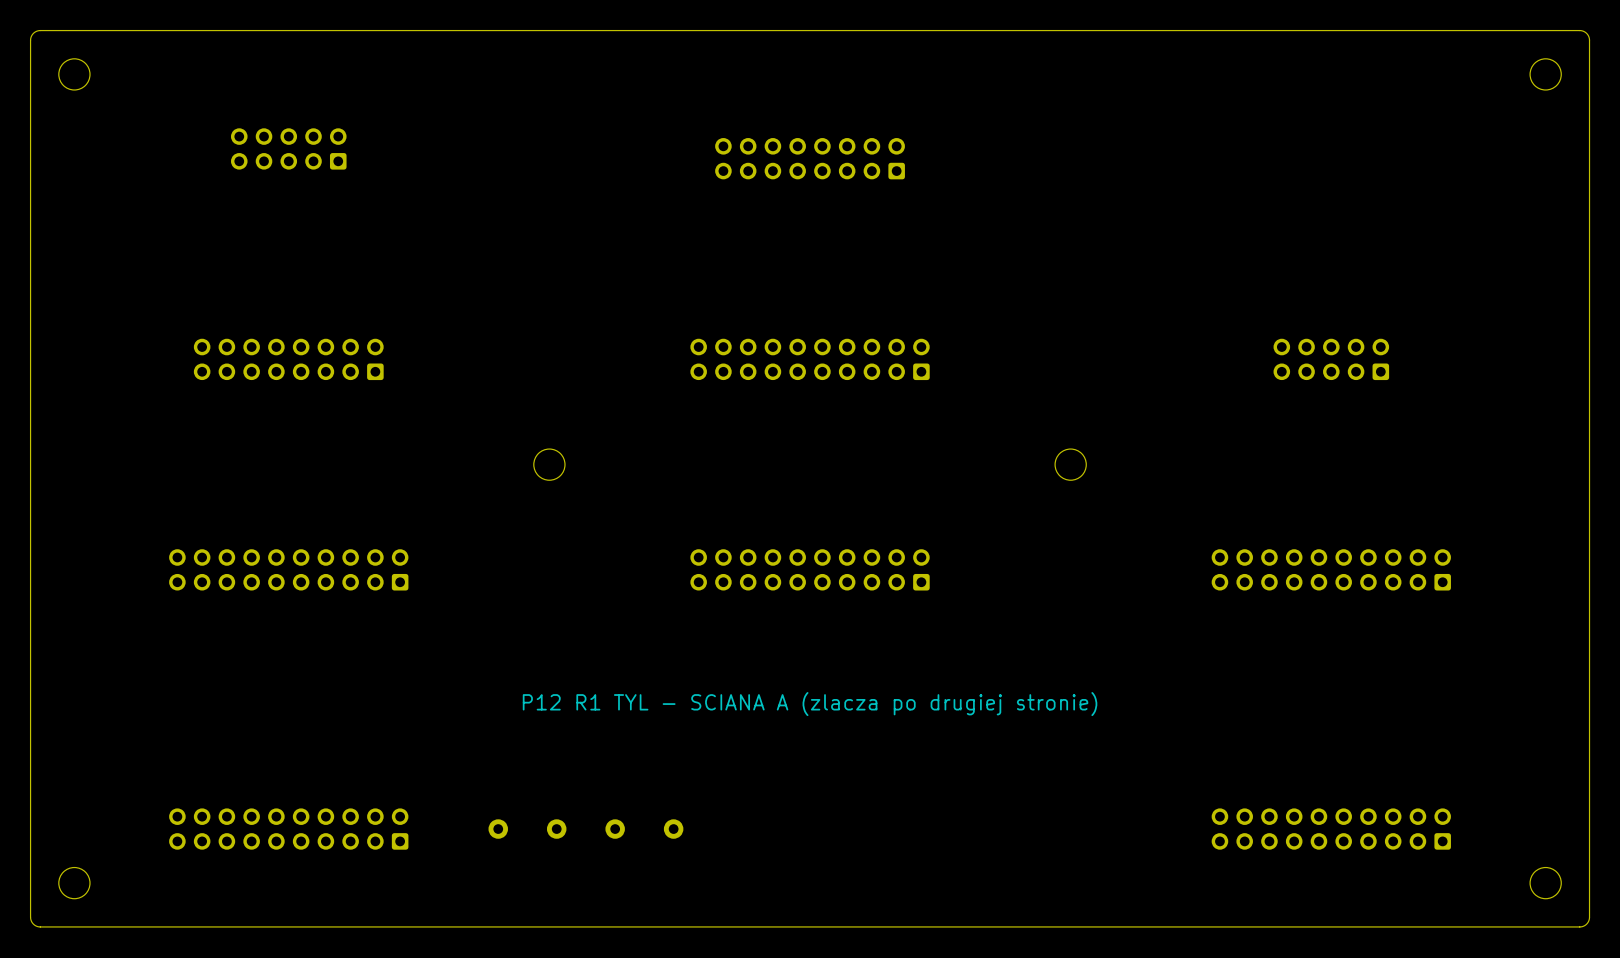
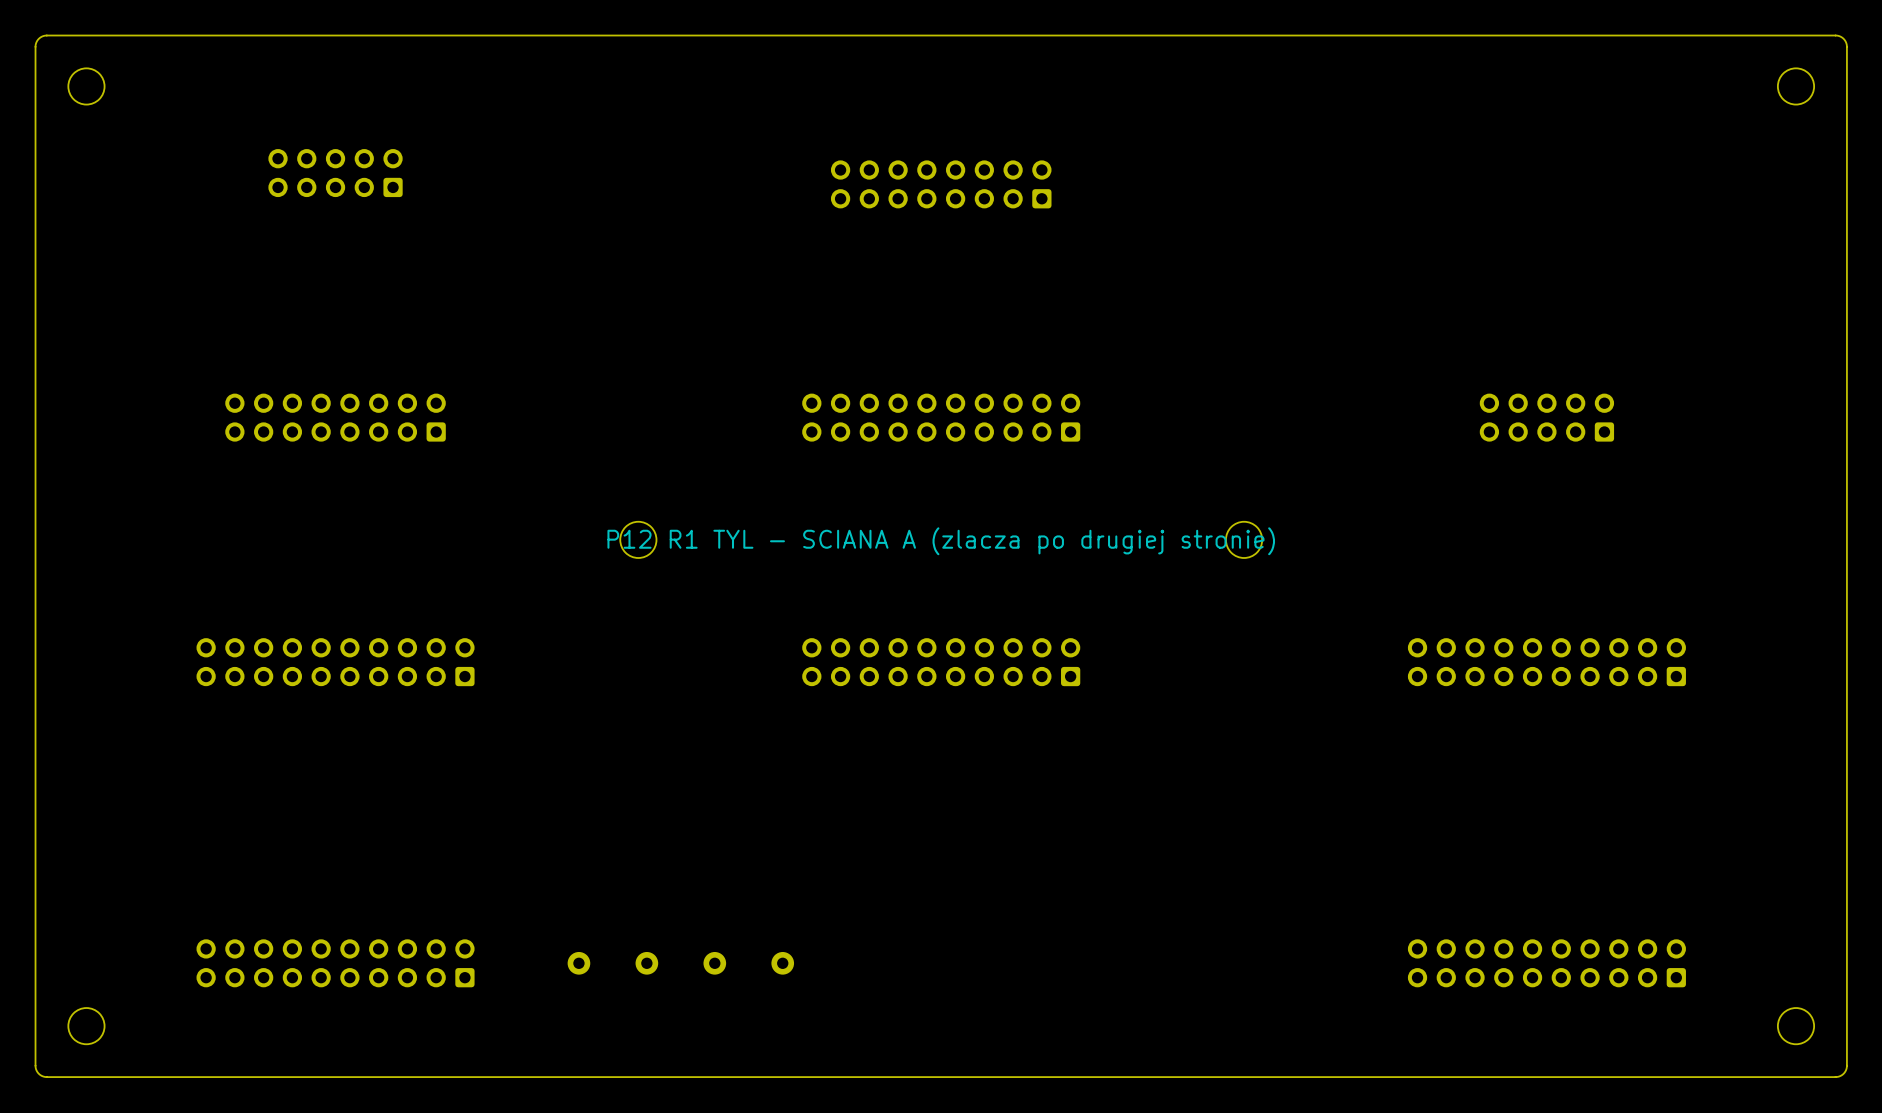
text position: P12 R1 TYL - SCIANA A (zlacza po drugiej stronie) (810, 704) -> P12 R1 TYL - SCIANA A (zlacza po drugiej stronie) (941, 541)

